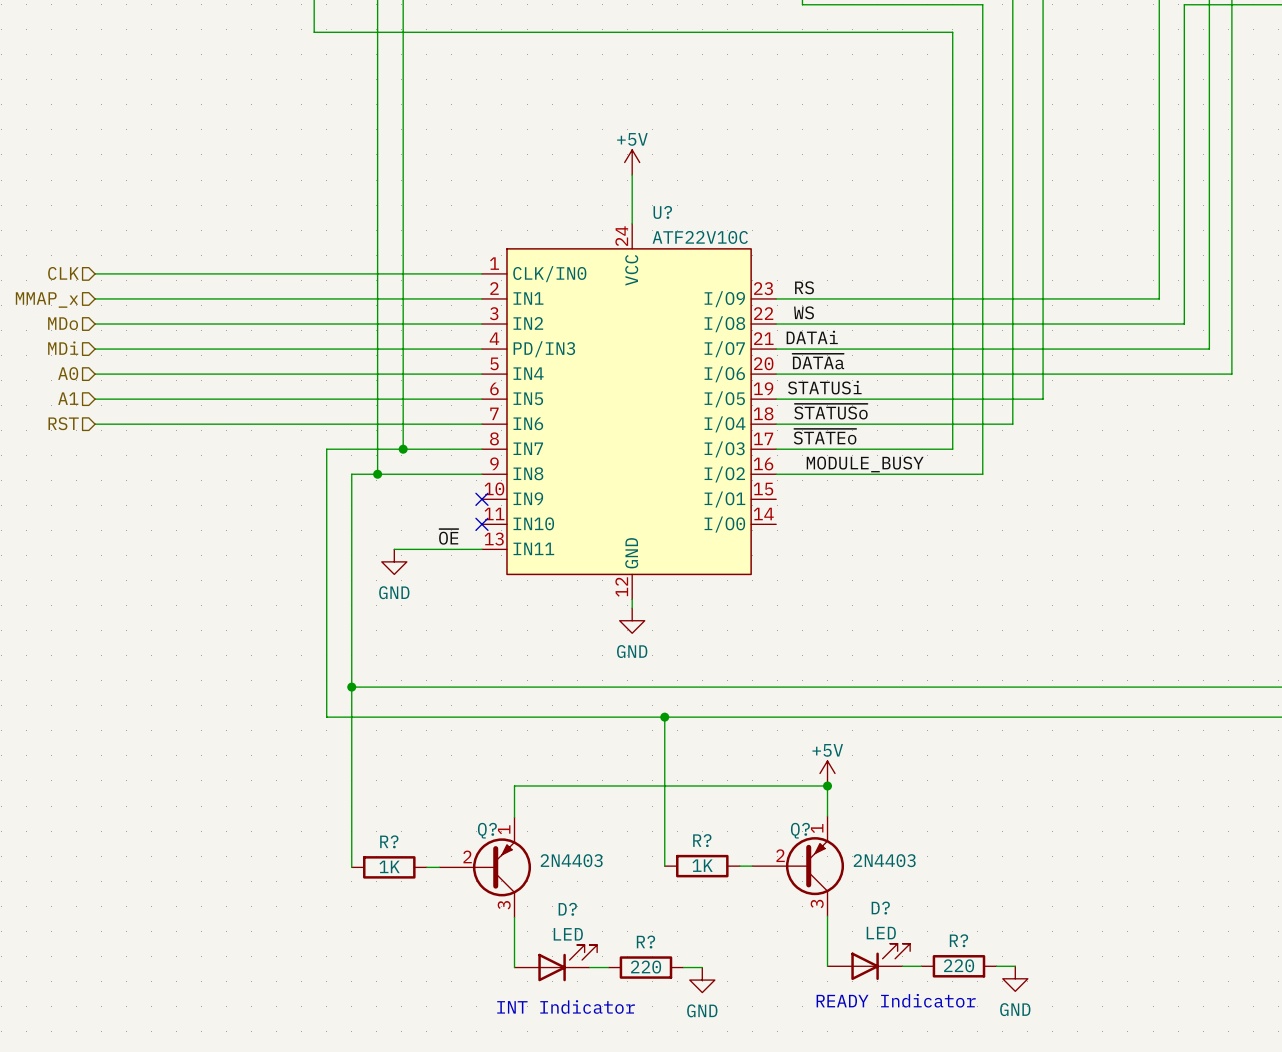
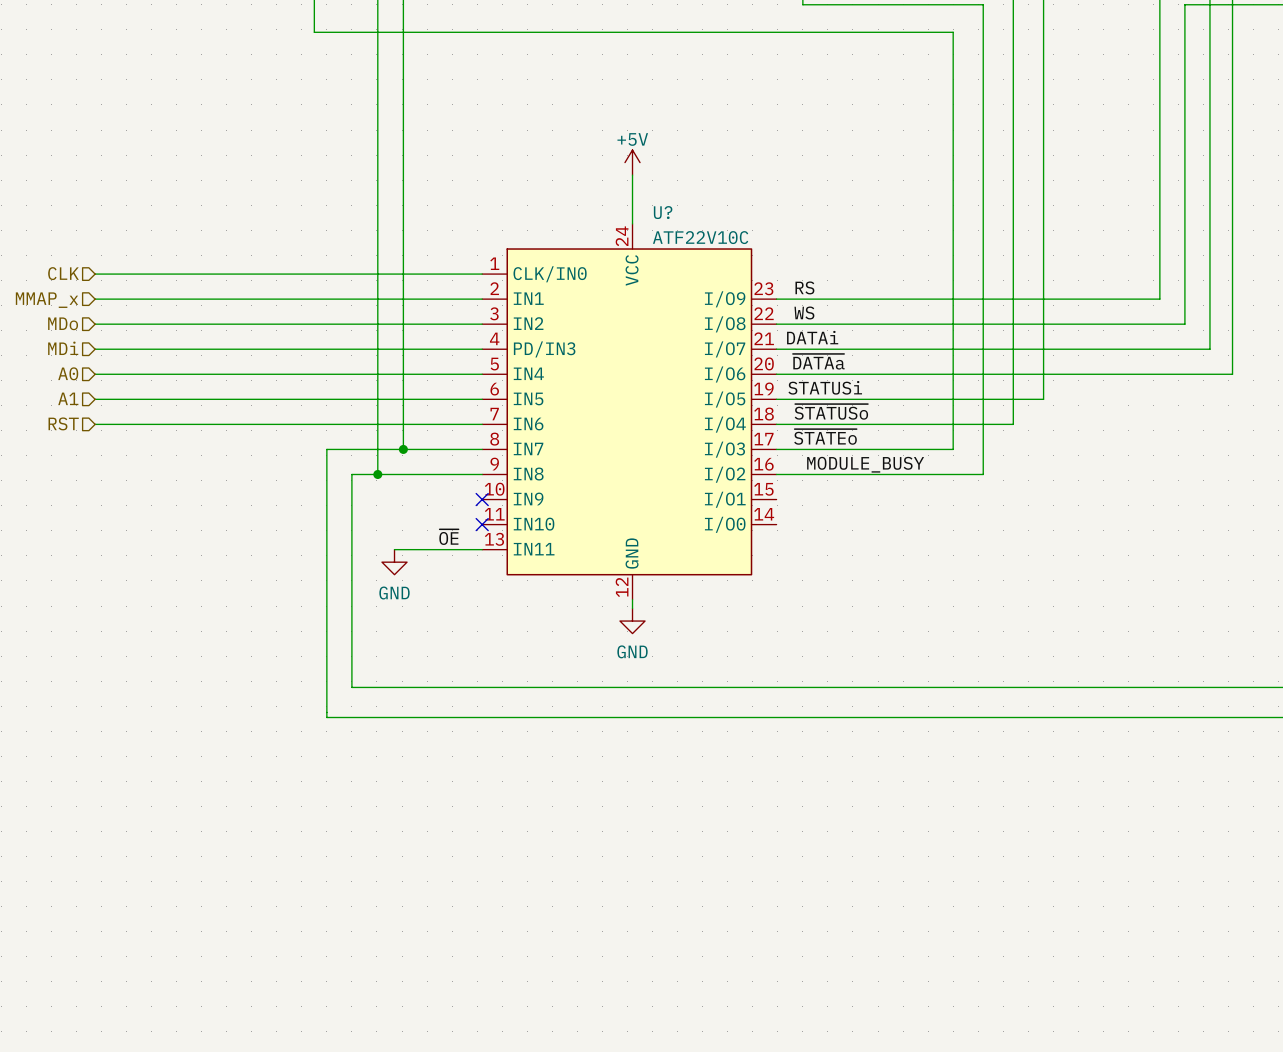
wire: (351, 687) (351, 867) -> none
junction: (351, 687) -> none
wire: (664, 717) (664, 866) -> none
junction: (664, 717) -> none
power symbol: +5V (827, 773) -> none
junction: (827, 785) -> none
wire: (827, 816) (827, 785) (514, 785) (514, 817) -> none
R?: 1K (702, 866) -> none
wire: (739, 866) (752, 866) -> none
Q?: 2N4403 (798, 866) -> none
R?: 1K (389, 867) -> none
wire: (426, 867) (439, 867) -> none
Q?: 2N4403 (485, 867) -> none
wire: (827, 916) (827, 966) -> none
wire: (514, 917) (514, 967) -> none
D?: LED (868, 961) -> none
D?: LED (555, 963) -> none
wire: (902, 966) (921, 966) -> none
R?: 220 (958, 966) -> none
wire: (996, 966) (1015, 966) -> none
wire: (589, 967) (608, 967) -> none
R?: 220 (645, 967) -> none
wire: (683, 967) (702, 967) -> none
power symbol: GND (1015, 978) -> none
power symbol: GND (702, 980) -> none
text: READY Indicator (896, 1000) -> none
text: INT Indicator (566, 1007) -> none

